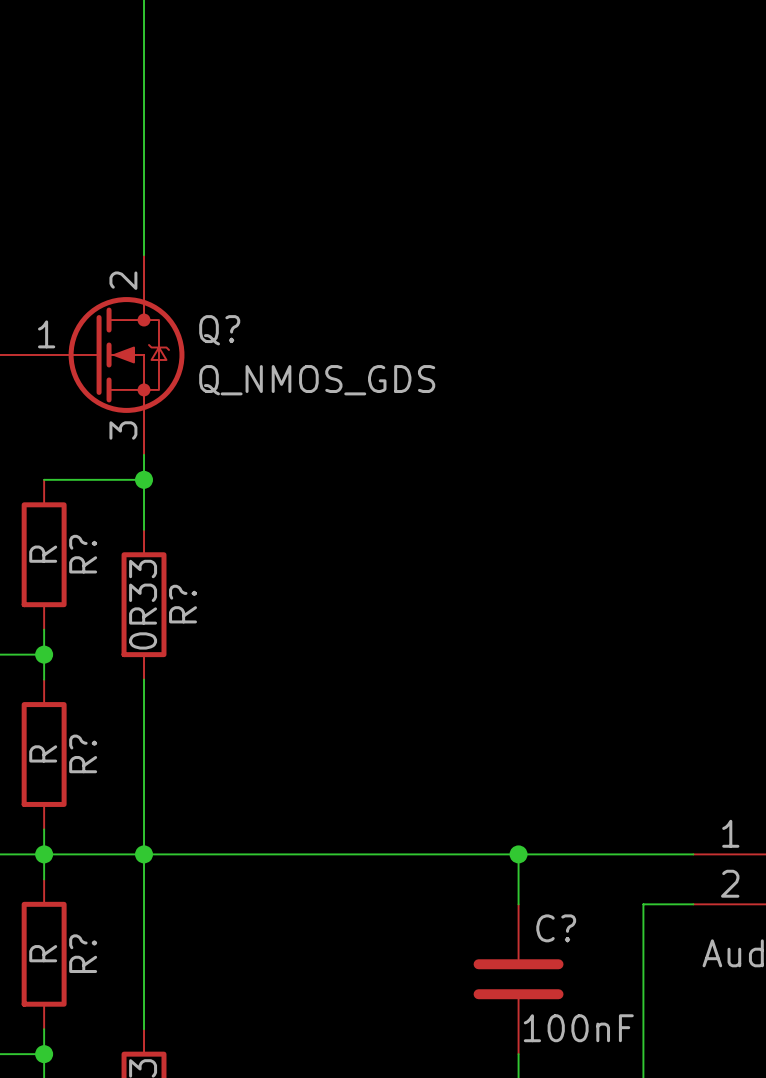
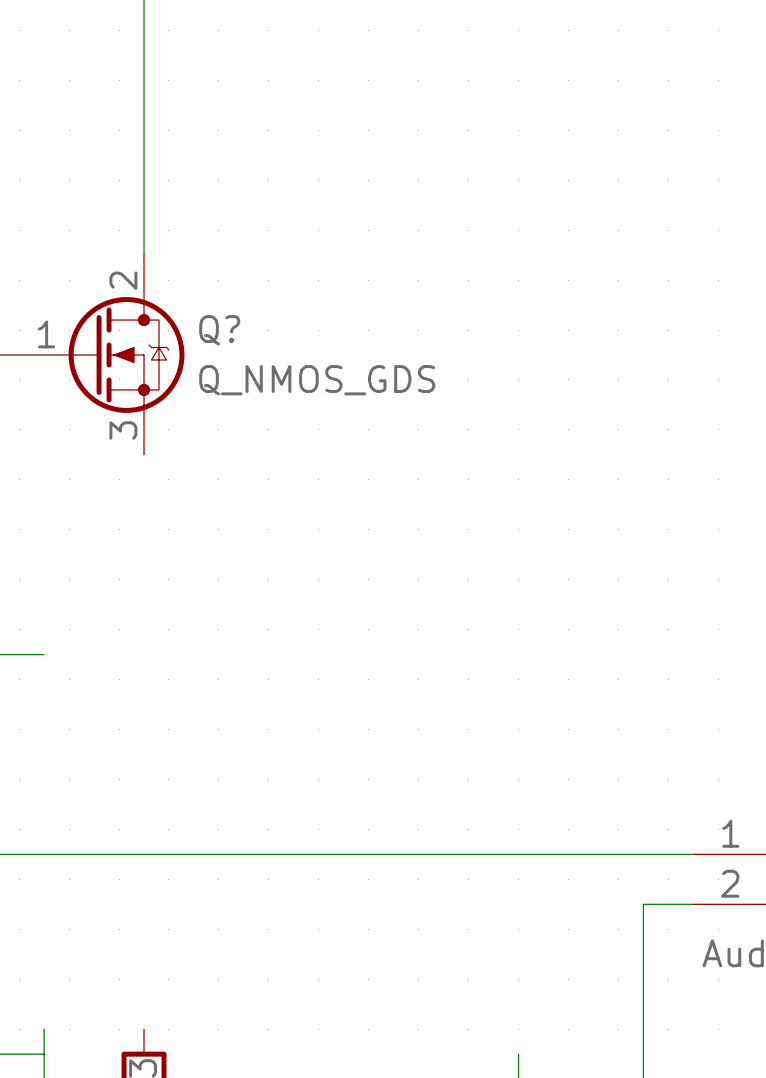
wire: (144, 454) (144, 529) -> none
wire: (44, 479) (144, 479) -> none
junction: (144, 479) -> none
R?: R (44, 554) -> none
R?: 0R33 (144, 604) -> none
wire: (44, 629) (44, 679) -> none
junction: (44, 654) -> none
wire: (144, 679) (144, 1029) -> none
R?: R (44, 754) -> none
wire: (44, 829) (44, 879) -> none
junction: (44, 854) -> none
junction: (144, 854) -> none
wire: (518, 854) (518, 904) -> none
junction: (518, 854) -> none
R?: R (44, 954) -> none
C?: 100nF (518, 979) -> none
junction: (44, 1054) -> none

